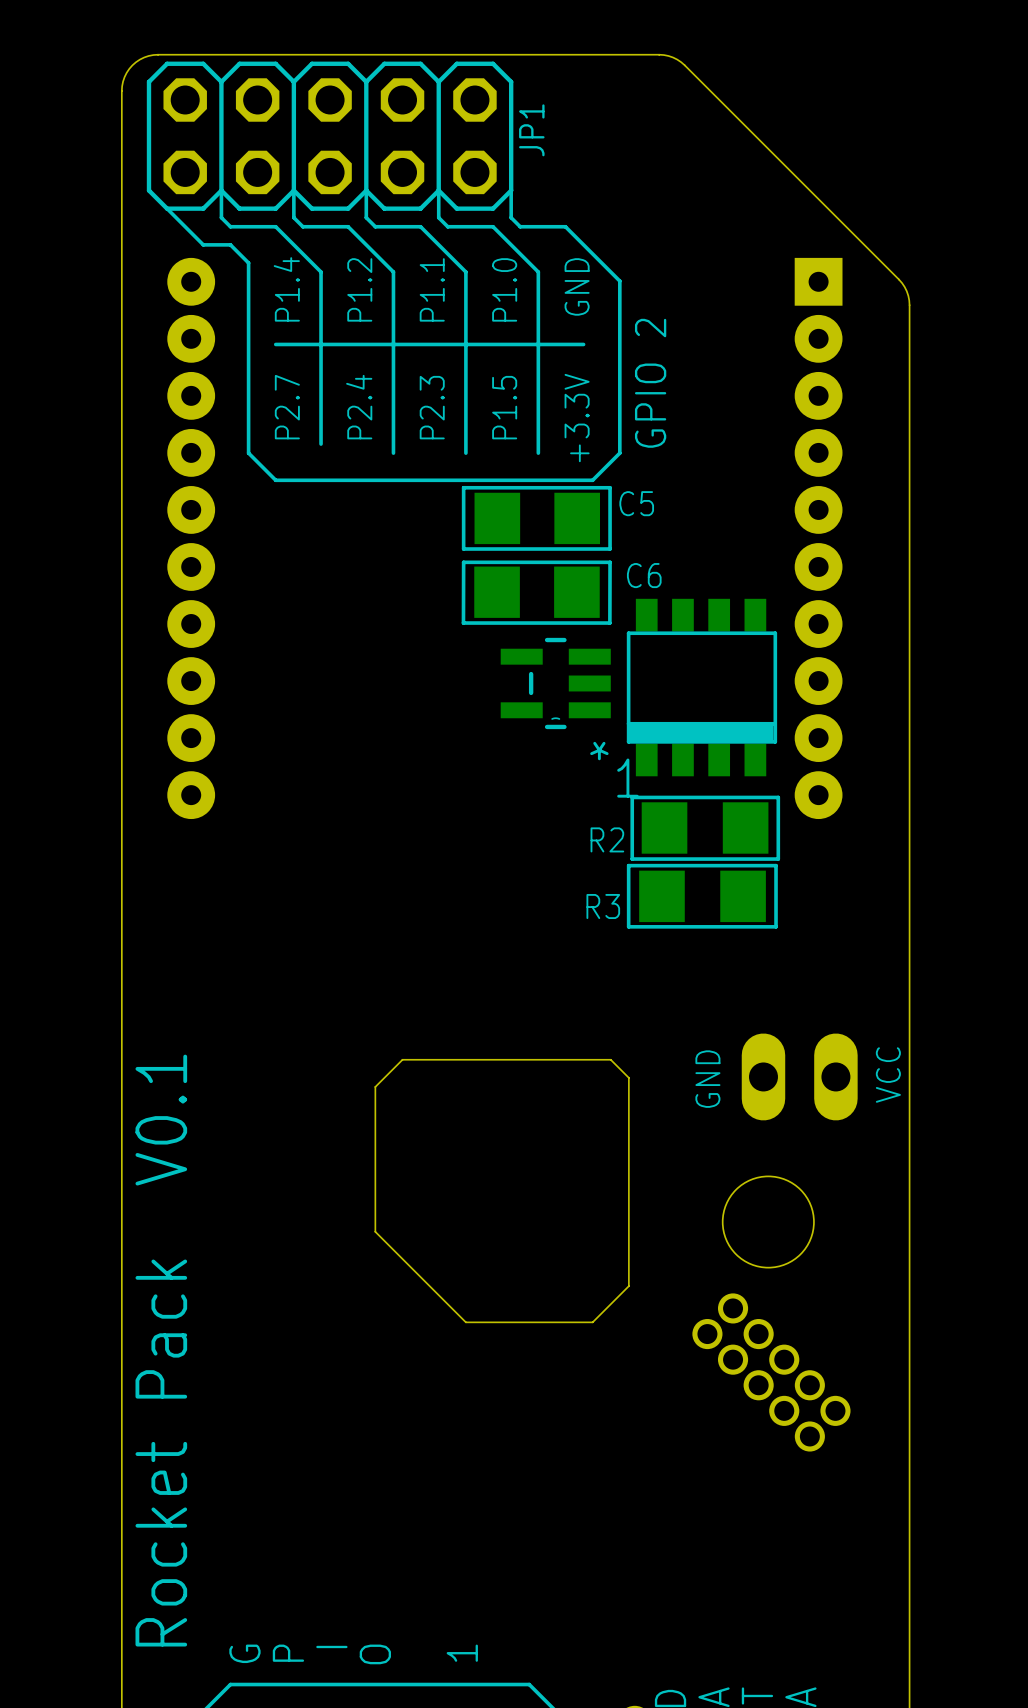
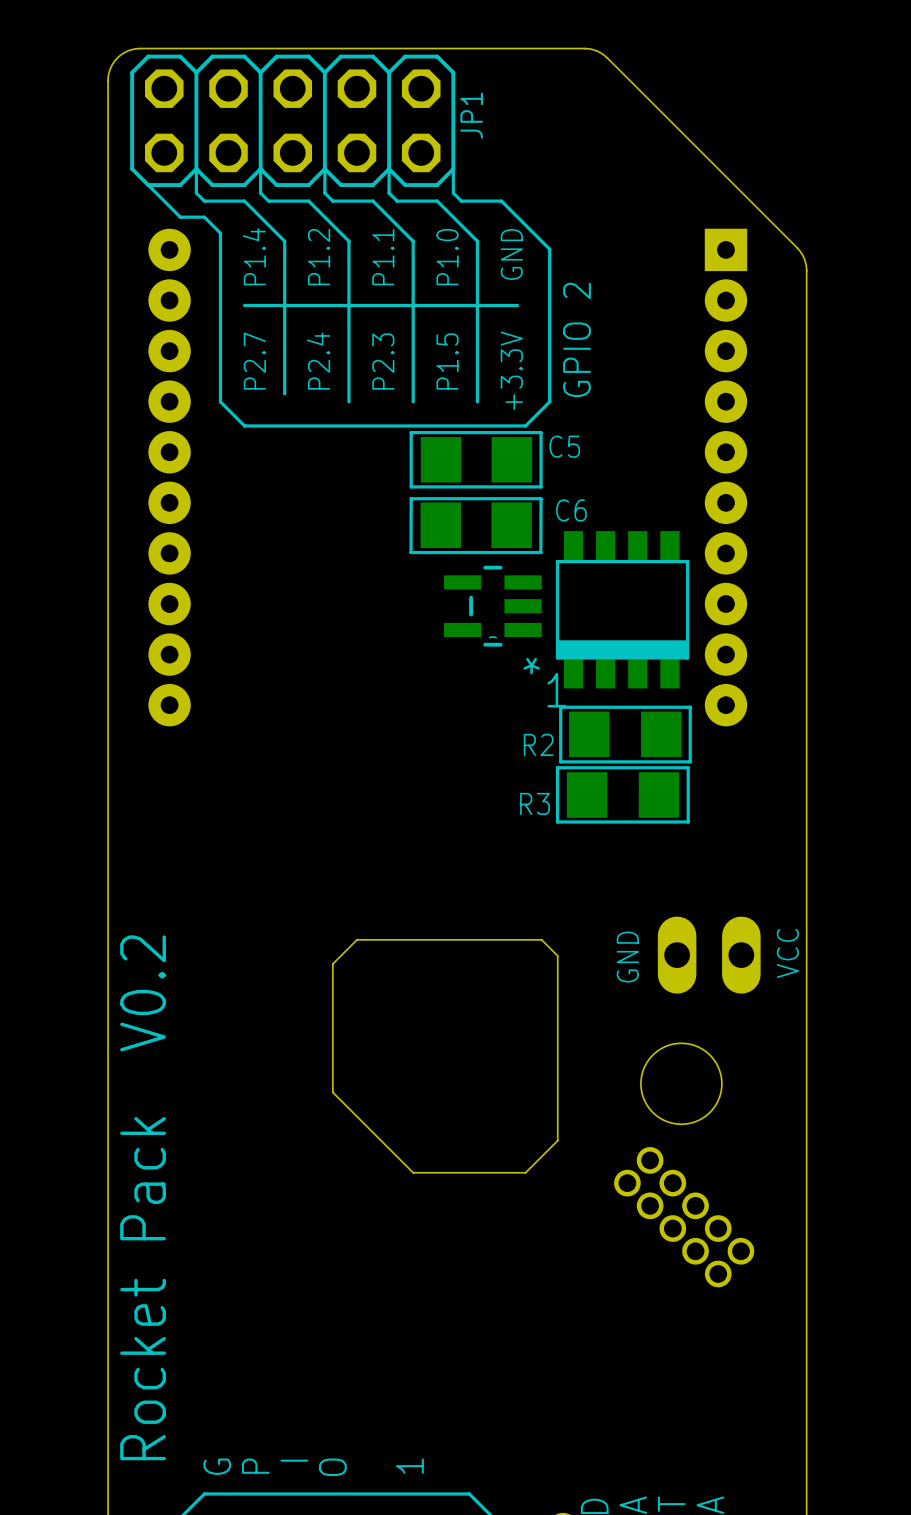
text: Rocket Pack V0.1 (161, 1350) -> Rocket Pack V0.2 (143, 1197)

